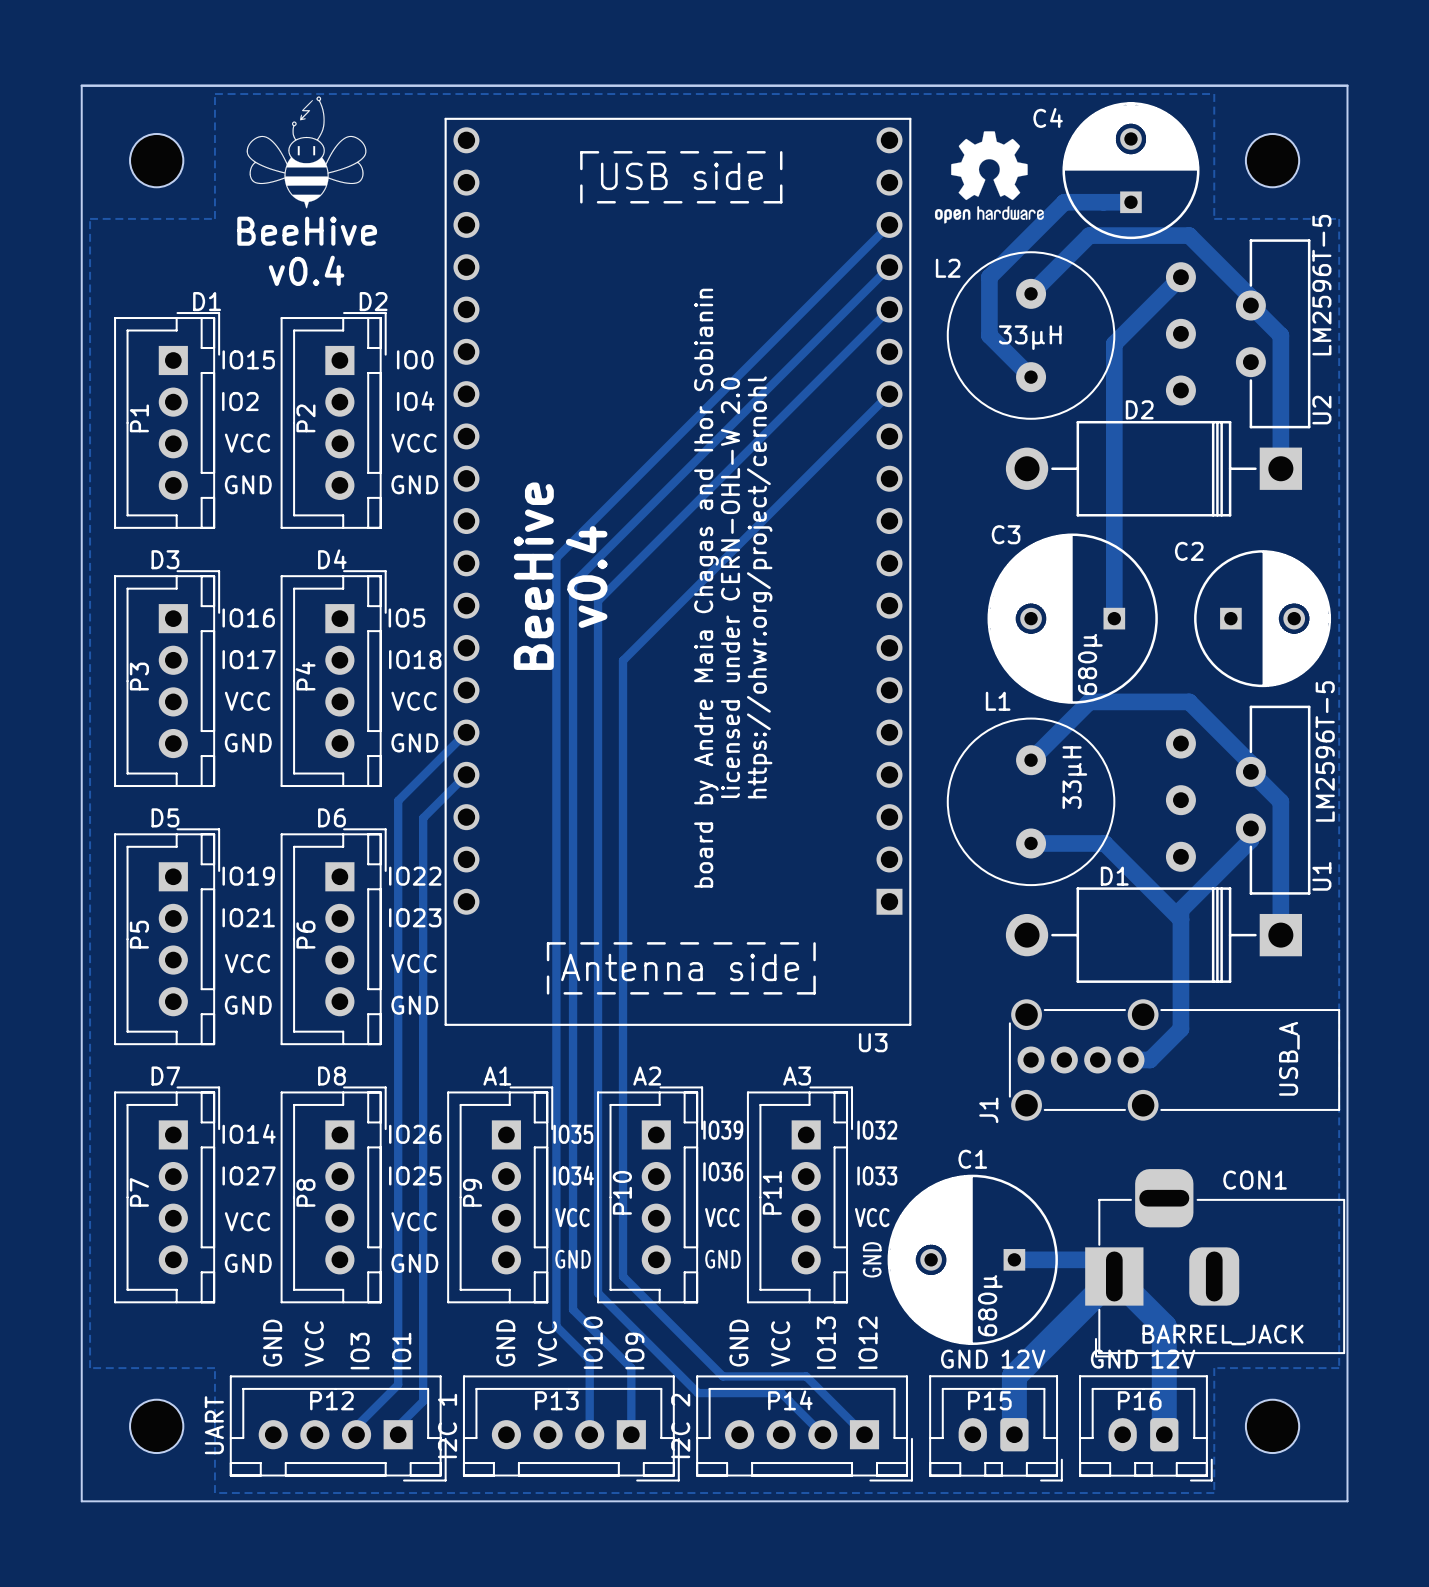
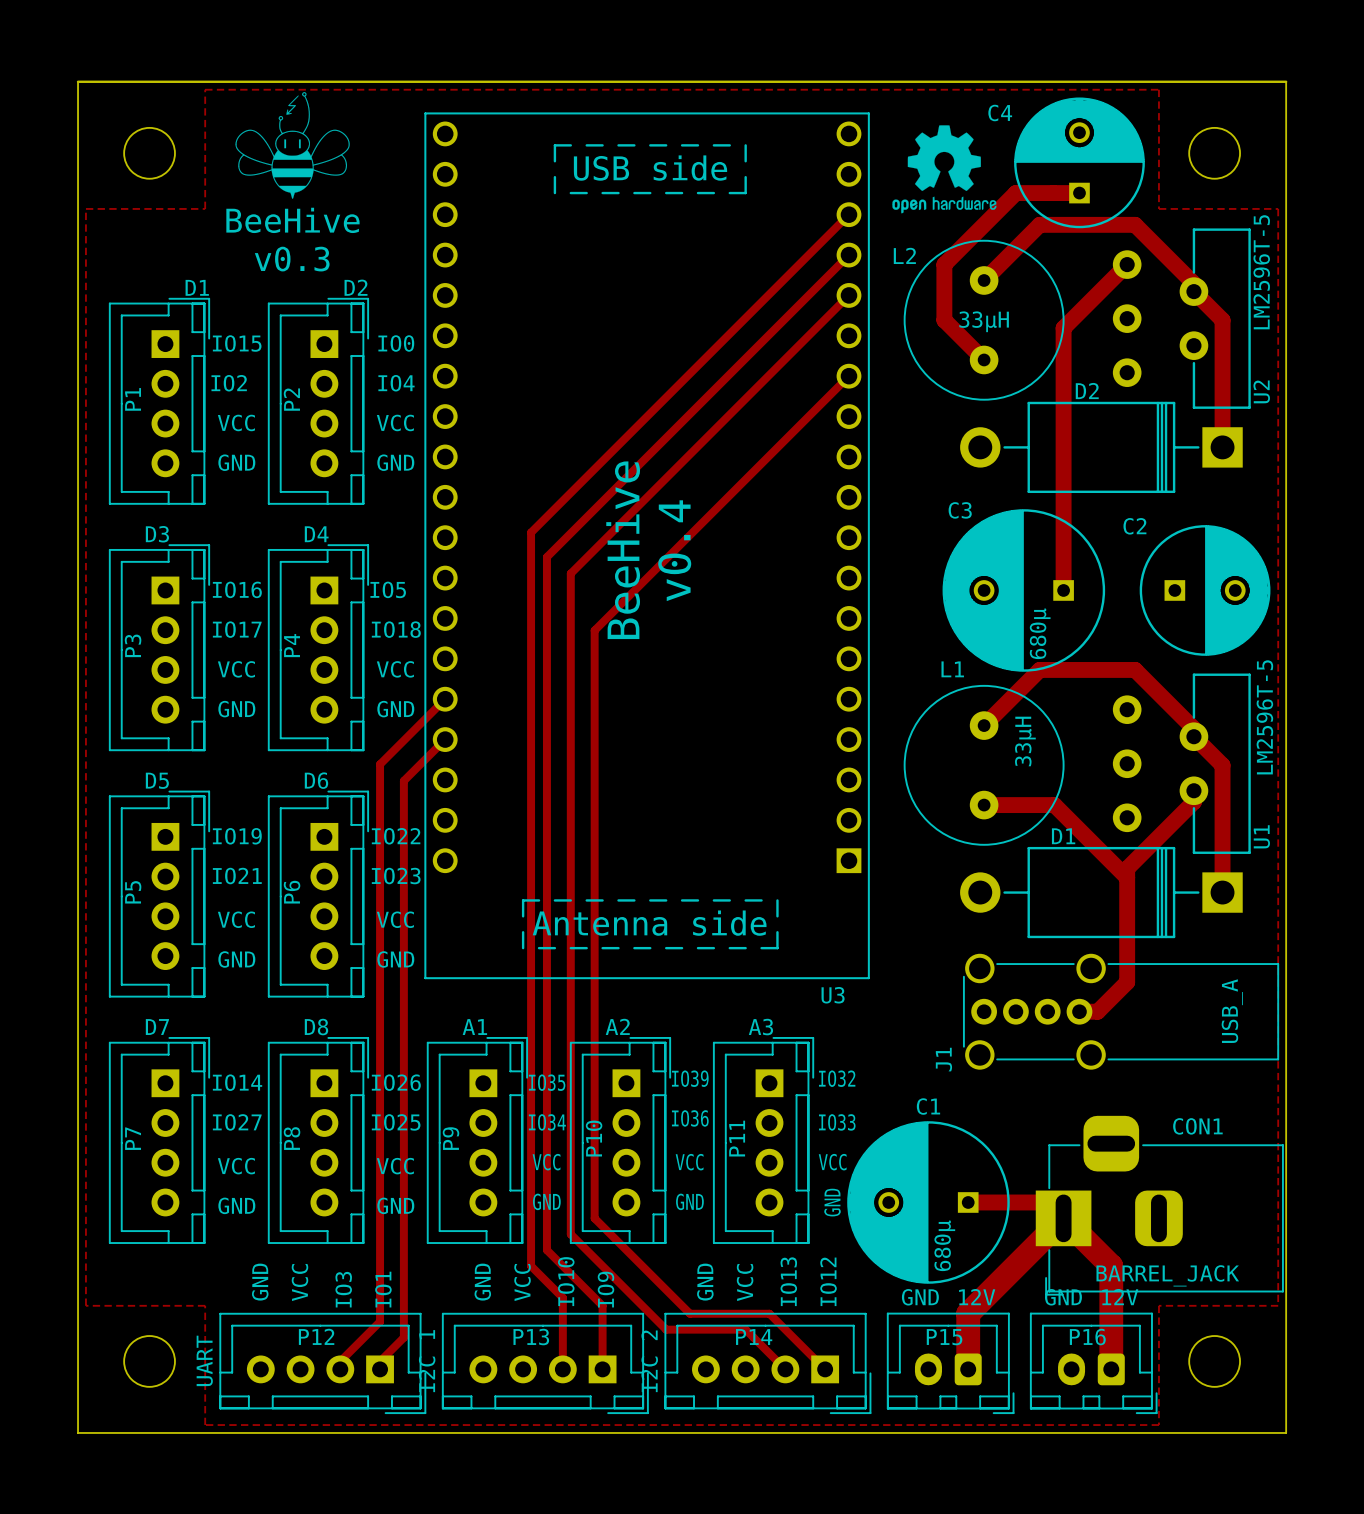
text: v0.4 (306, 270) -> v0.3 (292, 259)
text position: BeeHive (533, 576) -> BeeHive (623, 550)
text: v0.4 (586, 577) -> none
text: licensed under CERN-OHL-W 2.0 (730, 587) -> none
text: https://ohwr.org/project/cernohl (759, 587) -> none
text: board by Andre Maia Chagas and Ihor Sobianin (706, 588) -> v0.4 (674, 550)

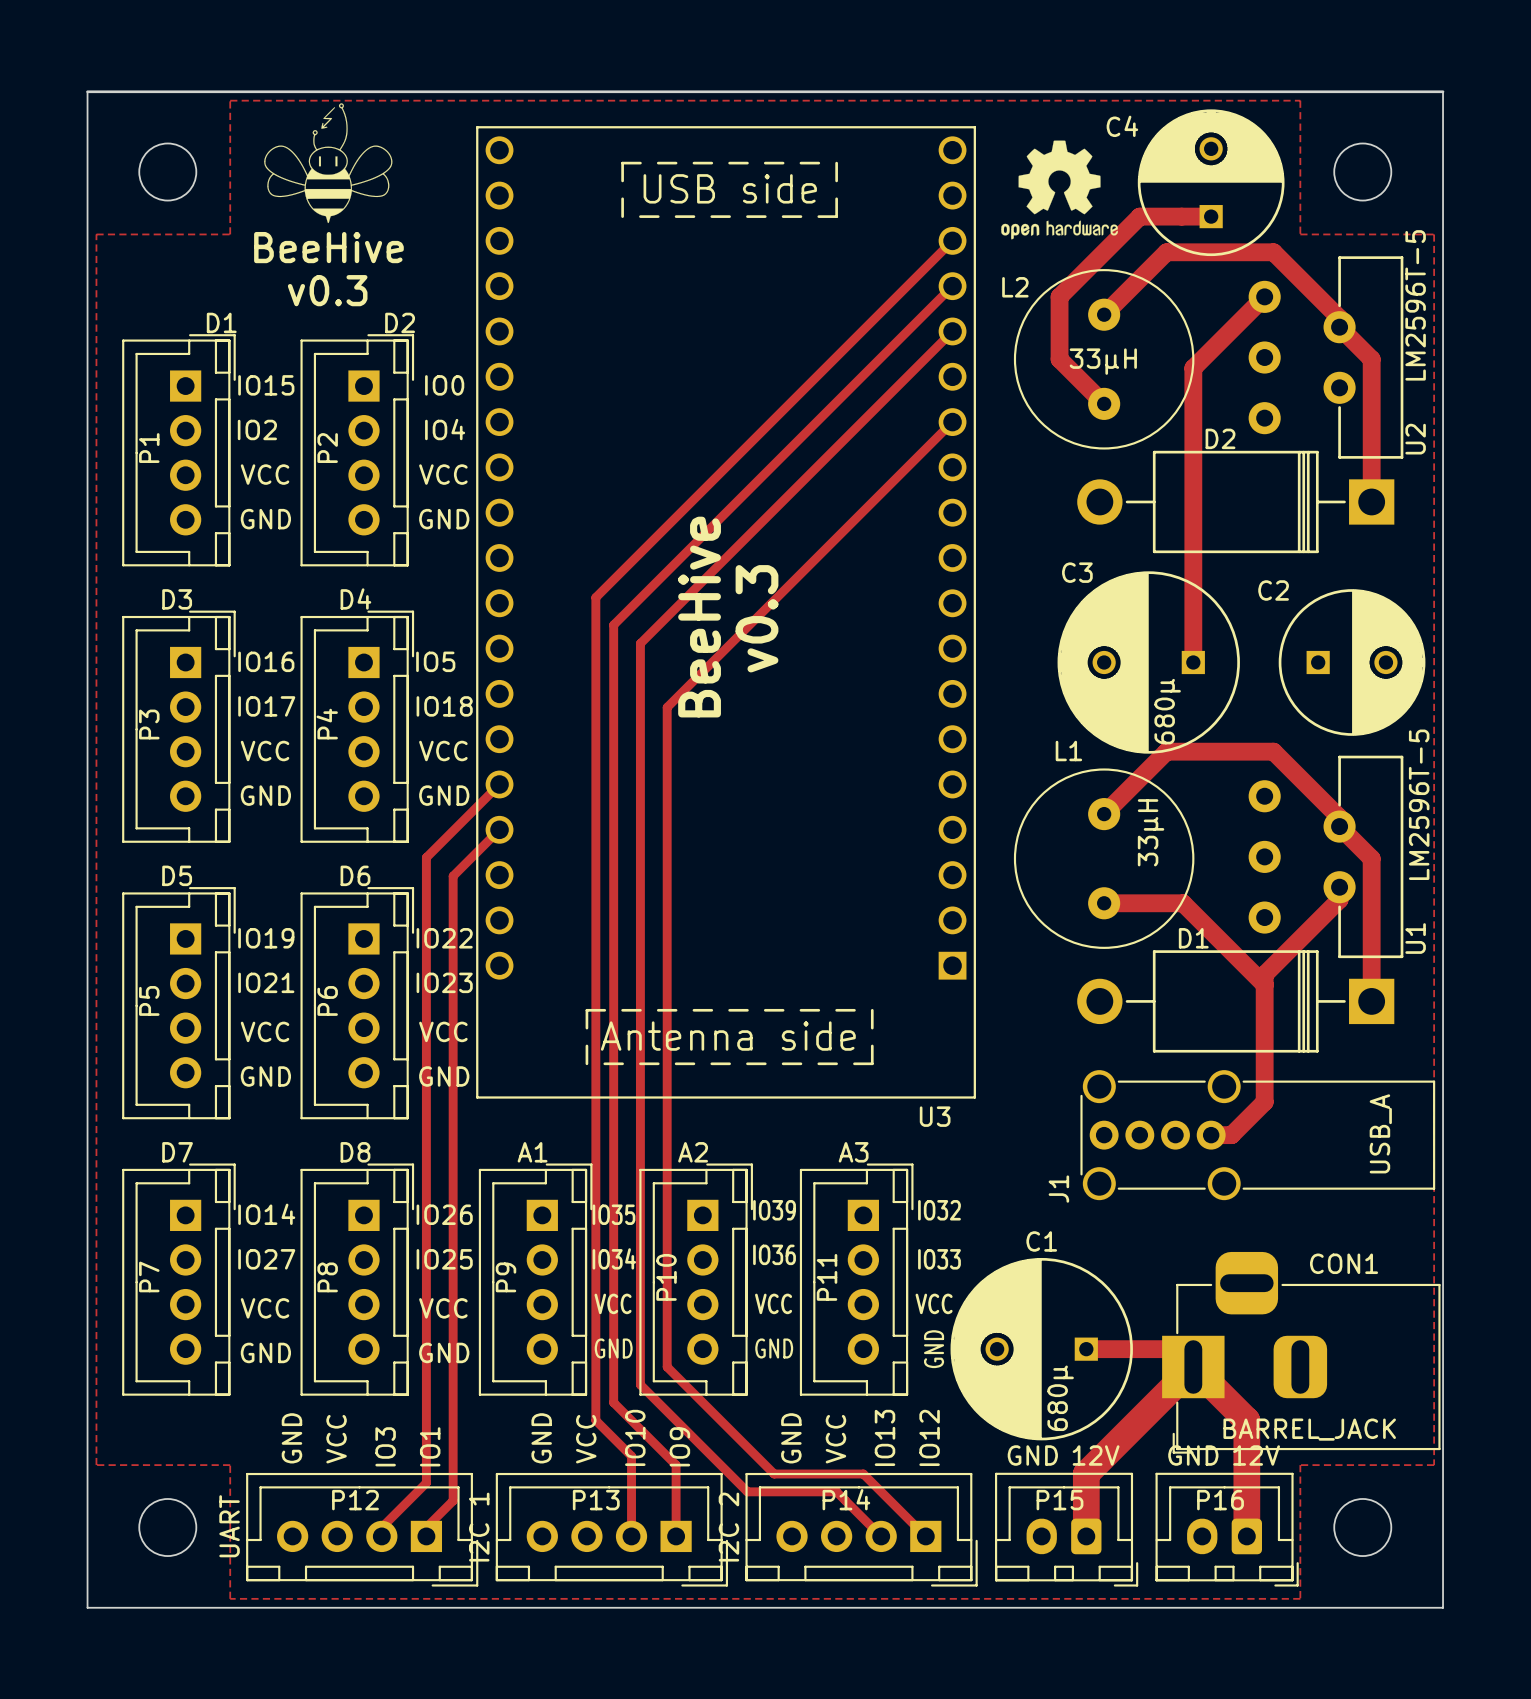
text: v0.4 (674, 550) -> v0.3 (756, 618)

